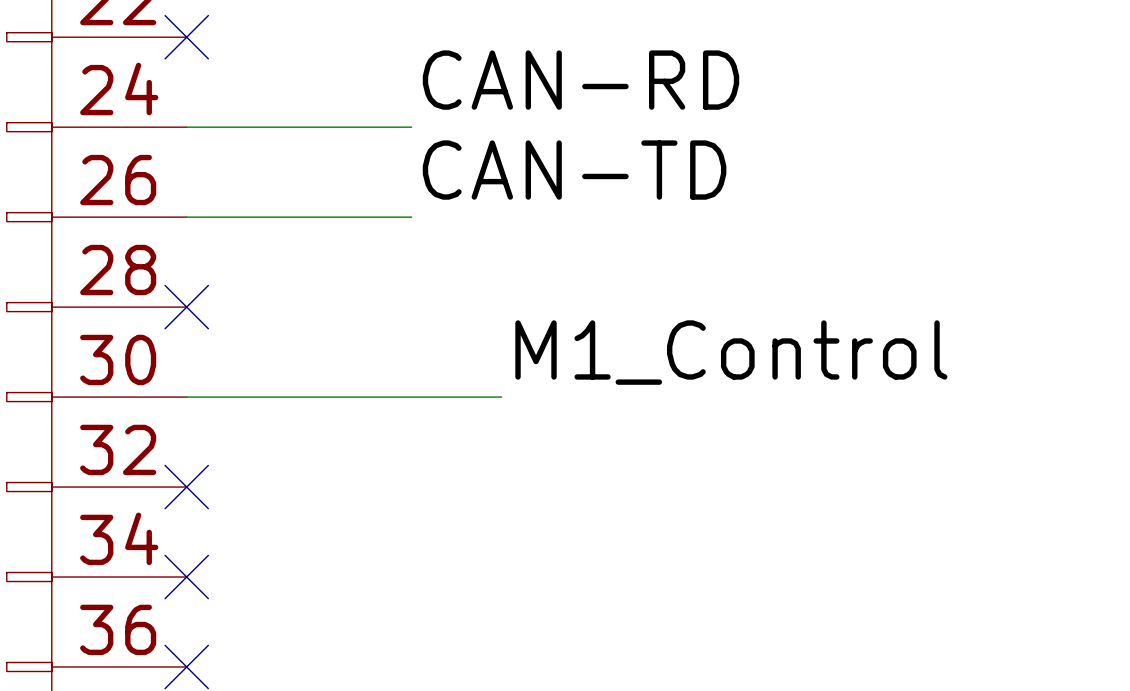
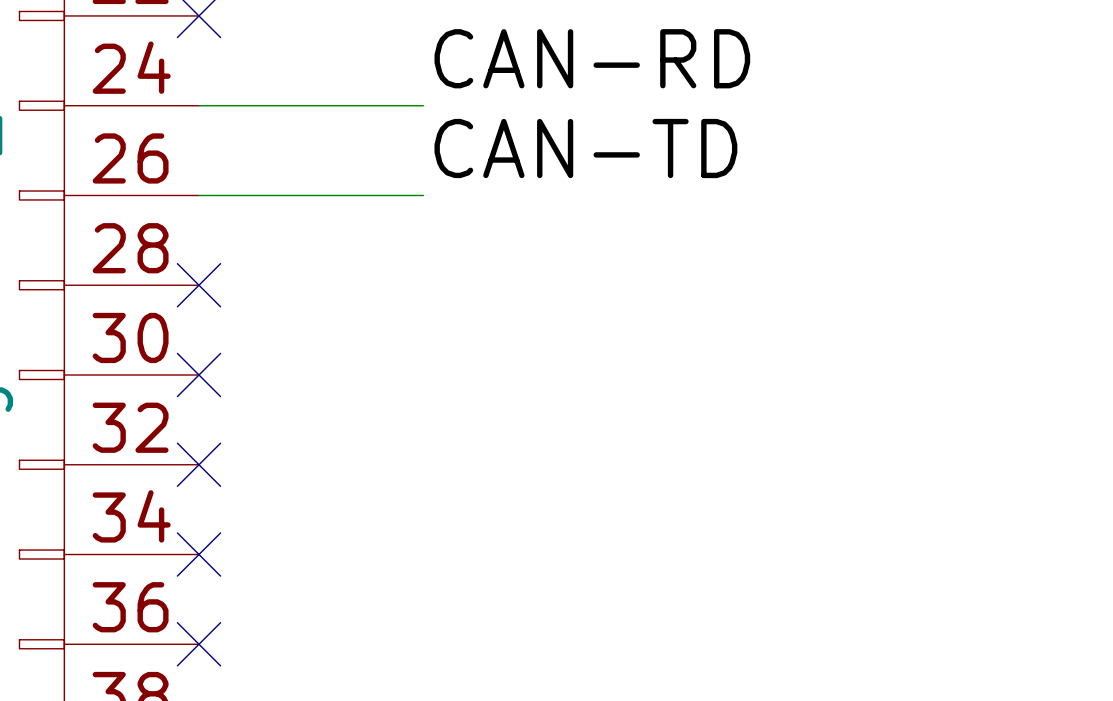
label: M1_Control (731, 352) -> none
wire: (186, 397) (501, 397) -> none
no-connect mark: none -> (198, 375)

